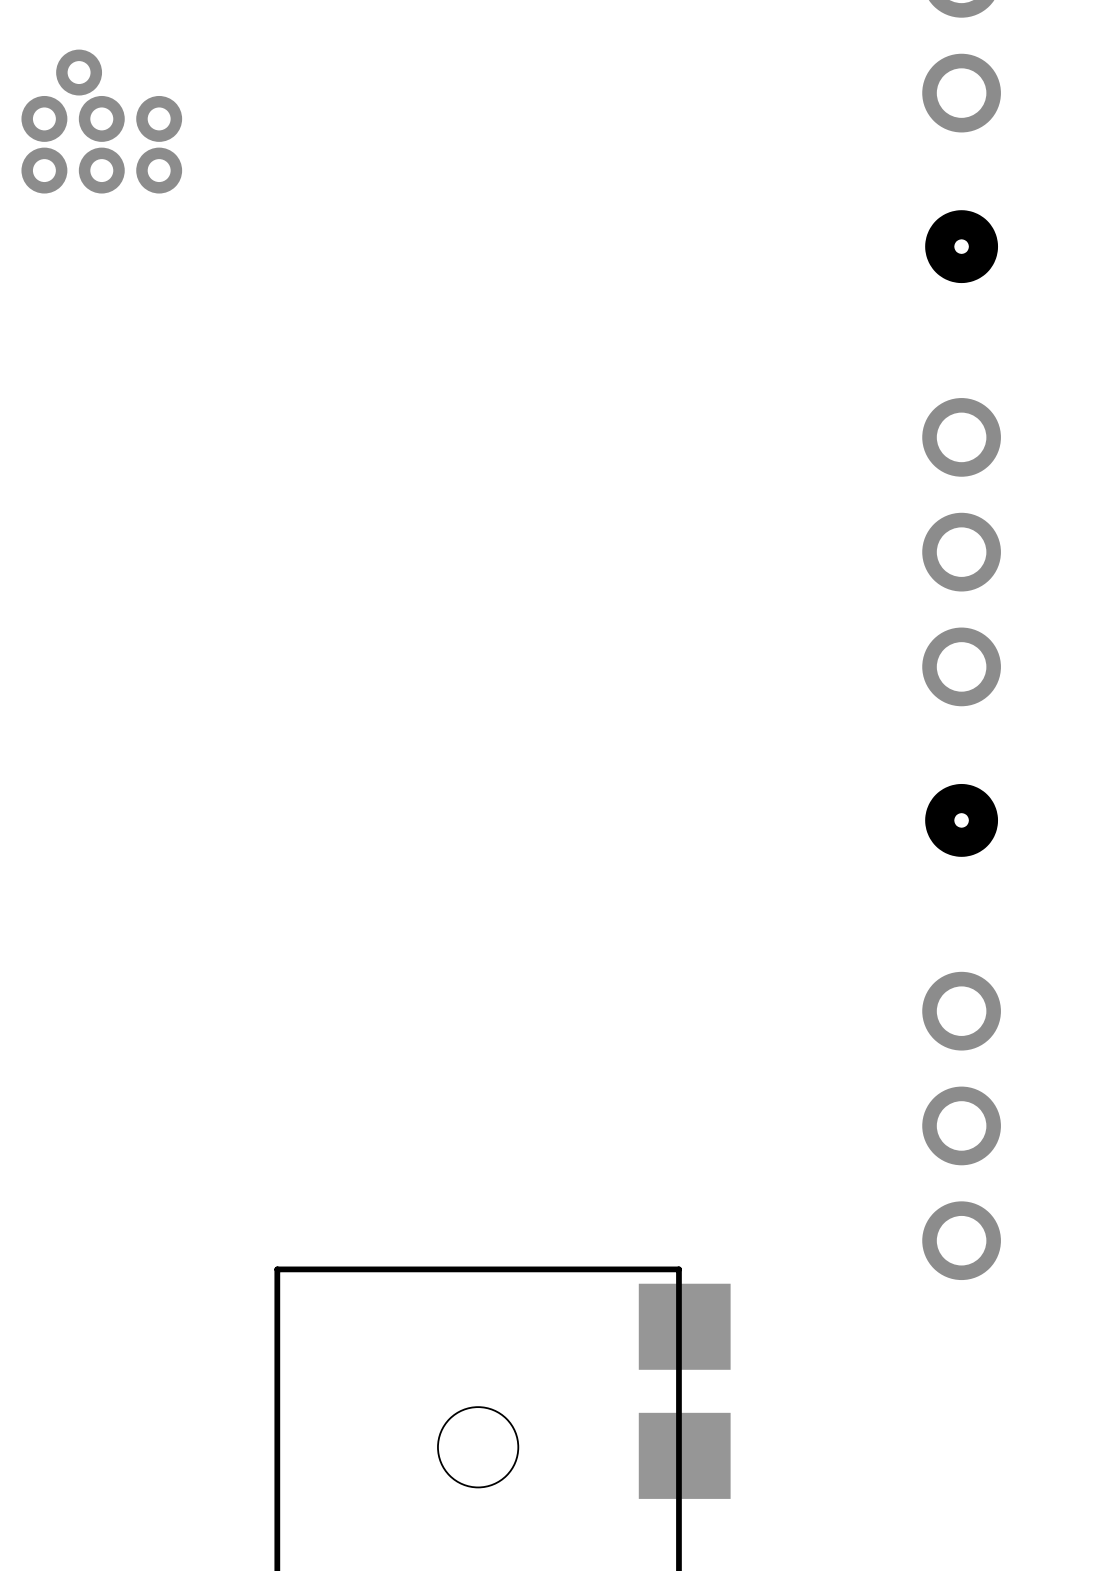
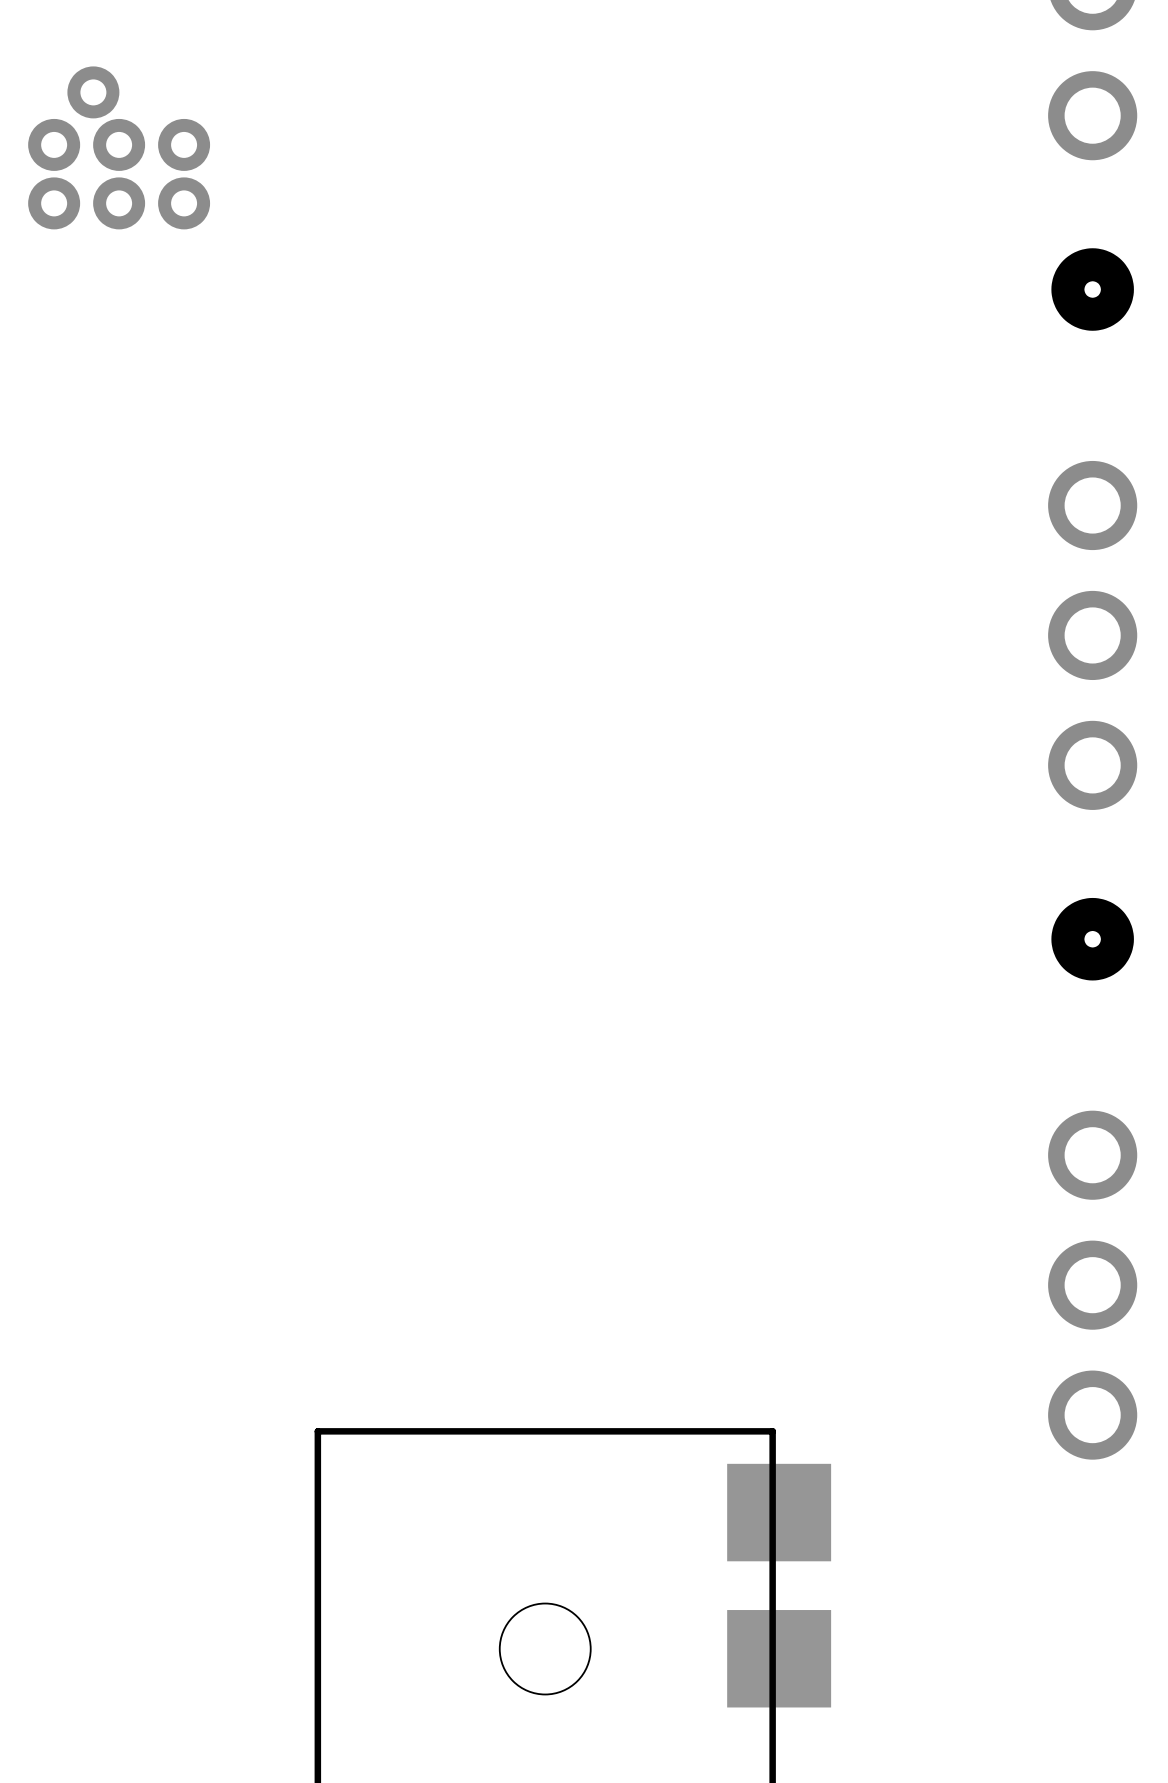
board edge: (678, 1269) (277, 1269) -> (772, 1447) (772, 1431) (317, 1431) (317, 1447)

